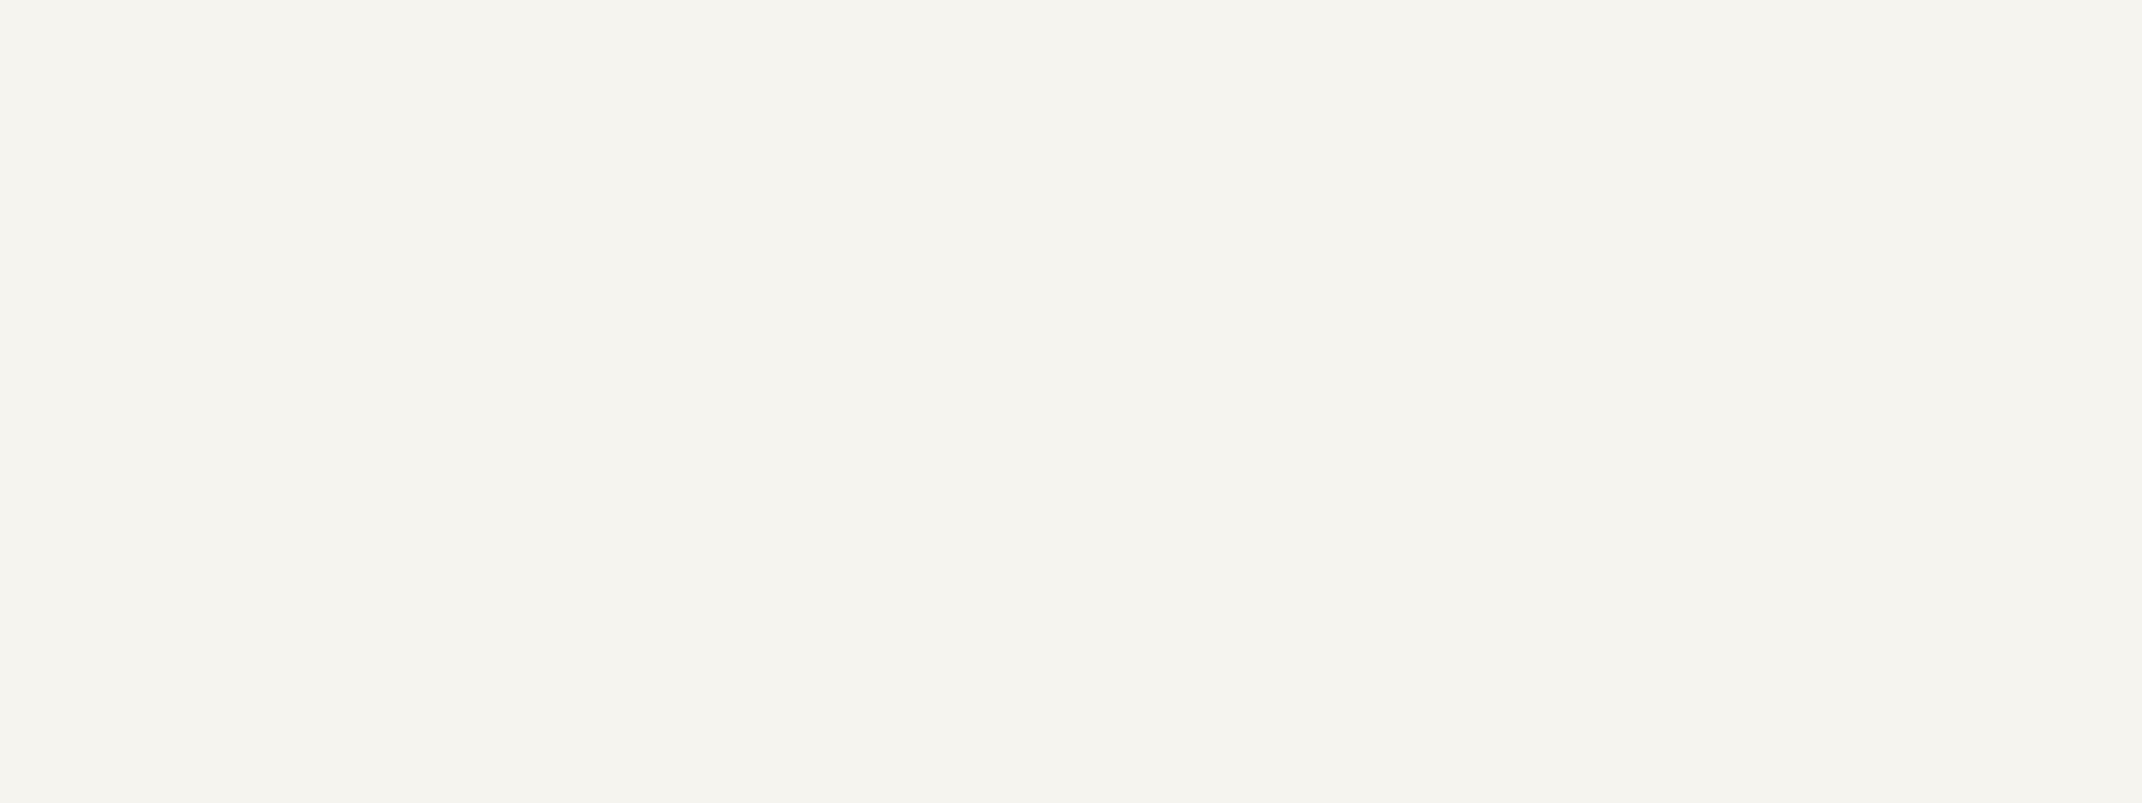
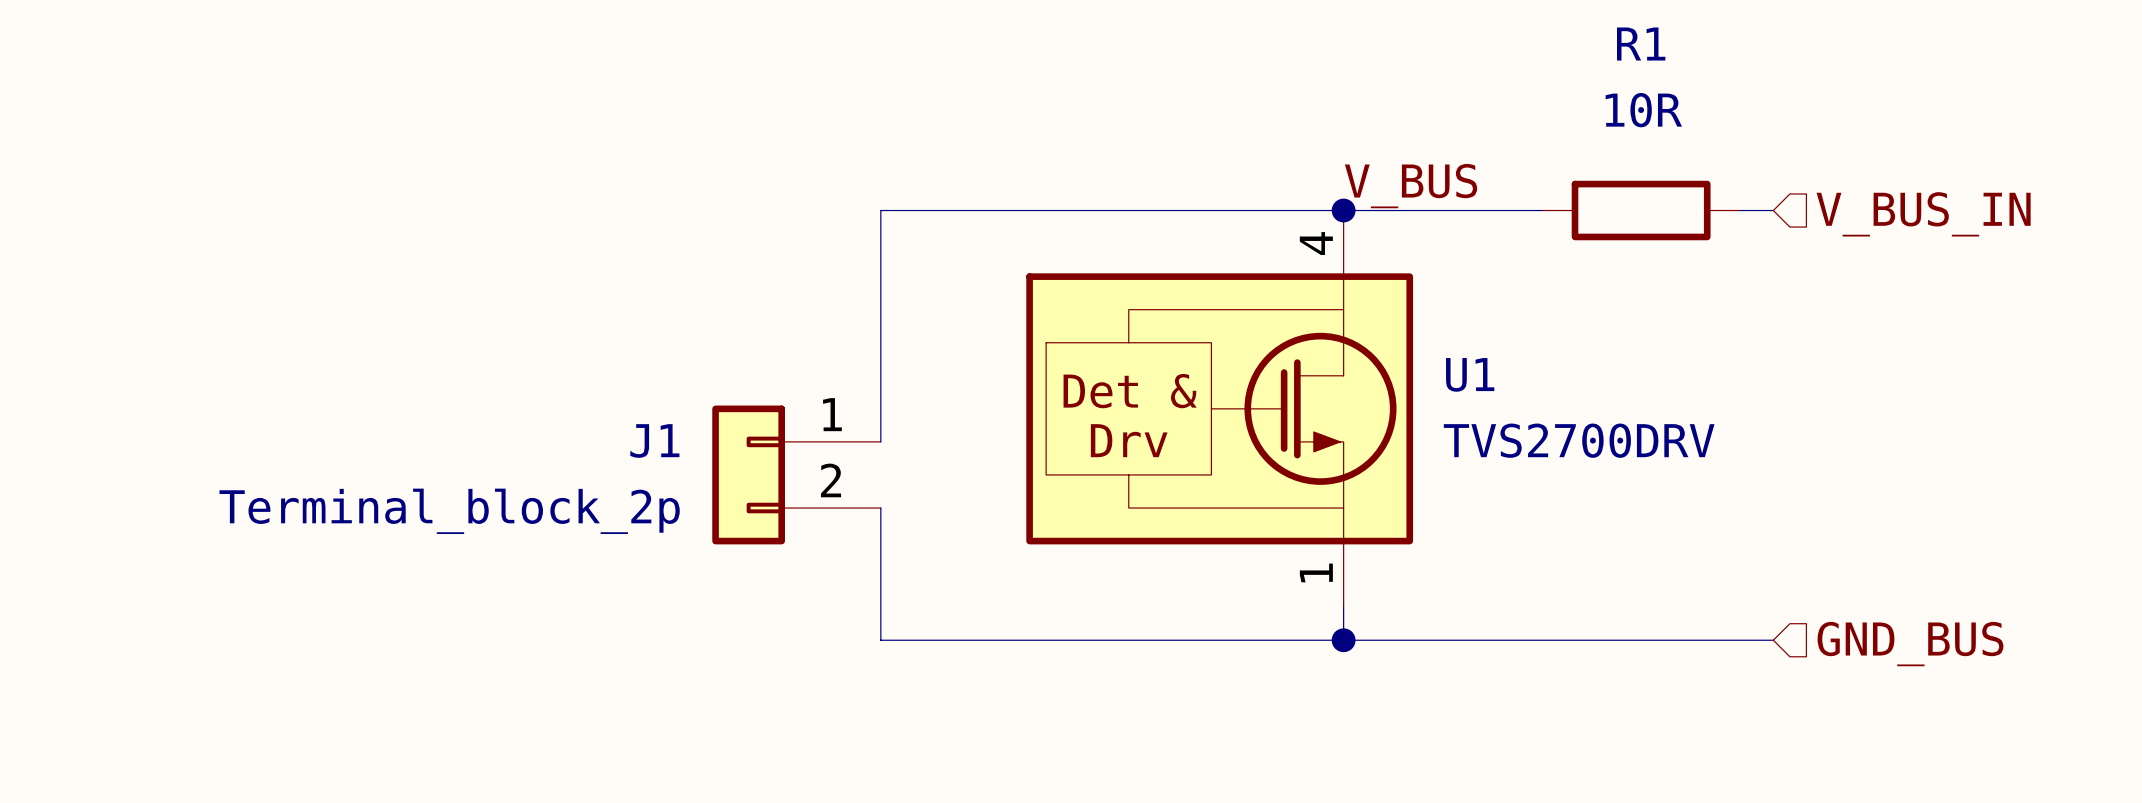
label: none -> V_BUS (1411, 186)
junction: none -> (1343, 210)
wire: none -> (1541, 210) (880, 210) (880, 441)
R1: none -> 10R (1641, 210)
wire: none -> (1740, 210) (1773, 210)
hierarchical label: none -> V_BUS_IN (1923, 214)
U1: none -> TVS2700DRV (1219, 408)
J1: none -> Terminal_block_2p (796, 474)
wire: none -> (880, 508) (880, 640) (1773, 640)
wire: none -> (1343, 607) (1343, 640)
junction: none -> (1343, 640)
hierarchical label: none -> GND_BUS (1910, 644)

